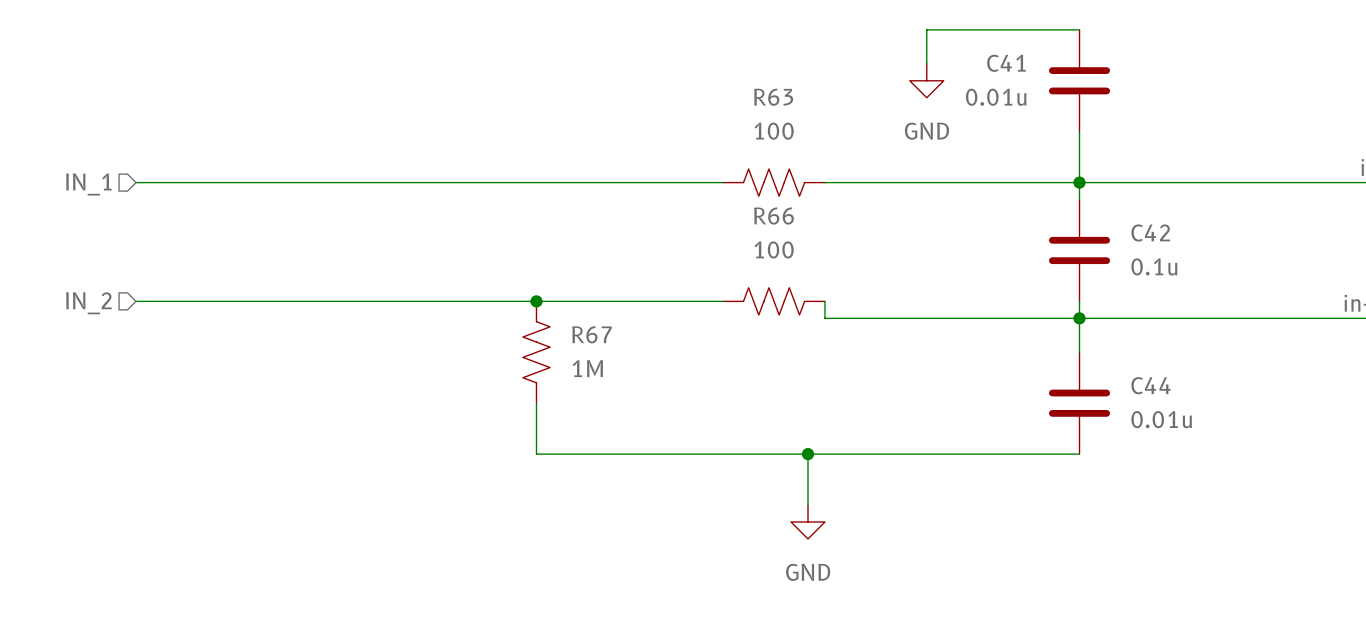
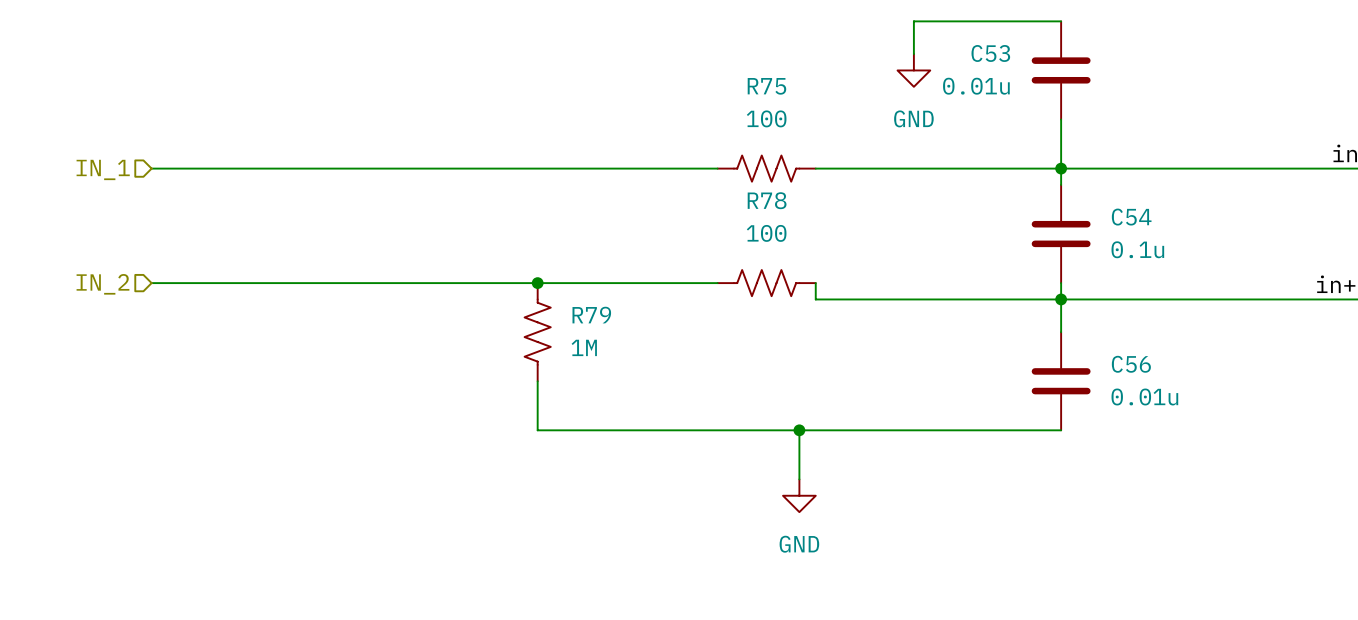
C41 name: C41 (1006, 63) -> C53 (990, 53)
R63 name: R63 (773, 97) -> R75 (766, 86)
R66 name: R66 (773, 216) -> R78 (767, 200)
C42 name: C42 (1150, 232) -> C54 (1131, 217)
R67 name: R67 (591, 334) -> R79 (591, 315)
C44 name: C44 (1151, 385) -> C56 (1131, 364)

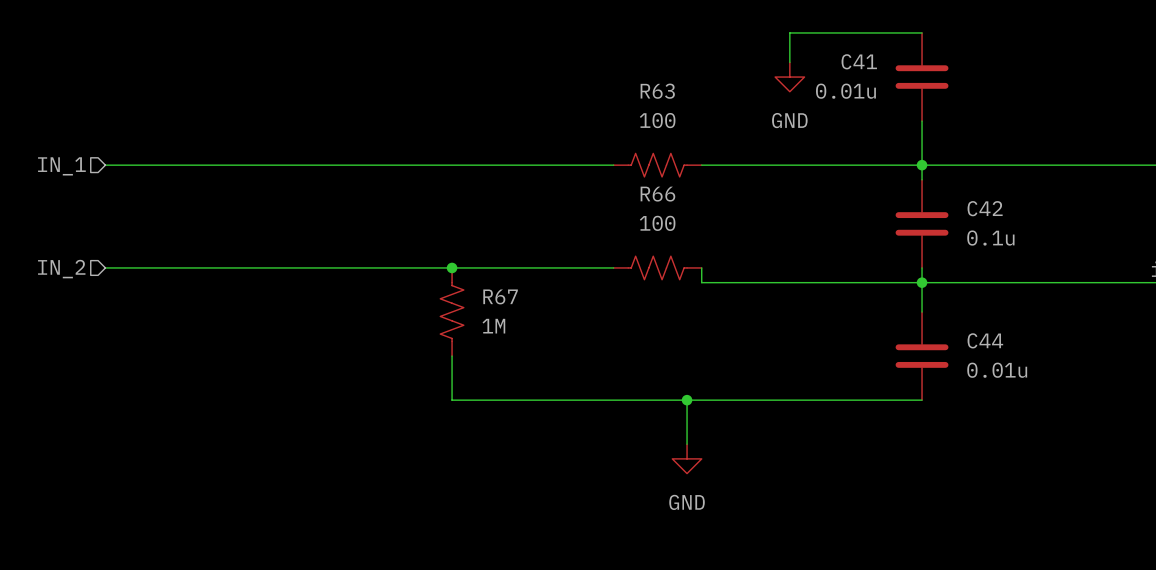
C53 name: C53 (990, 53) -> C41 (859, 61)
R75 name: R75 (766, 86) -> R63 (657, 91)
R78 name: R78 (767, 200) -> R66 (657, 194)
C54 name: C54 (1131, 217) -> C42 (985, 208)
R79 name: R79 (591, 315) -> R67 (500, 296)
C56 name: C56 (1131, 364) -> C44 (985, 340)

